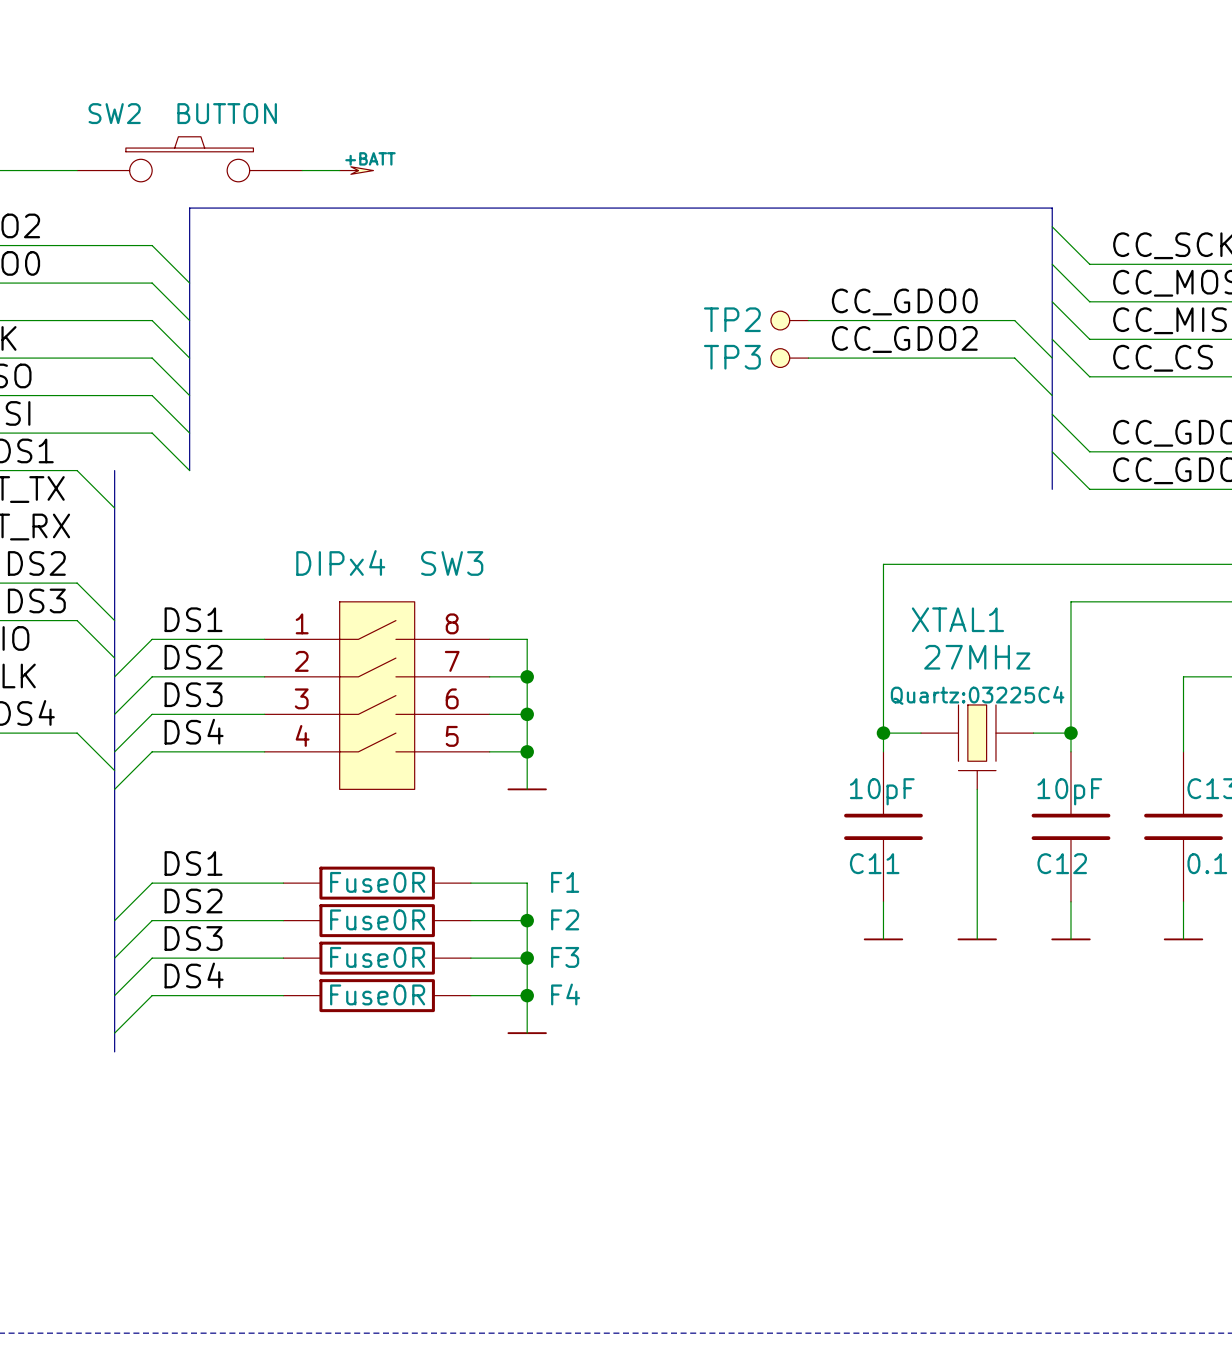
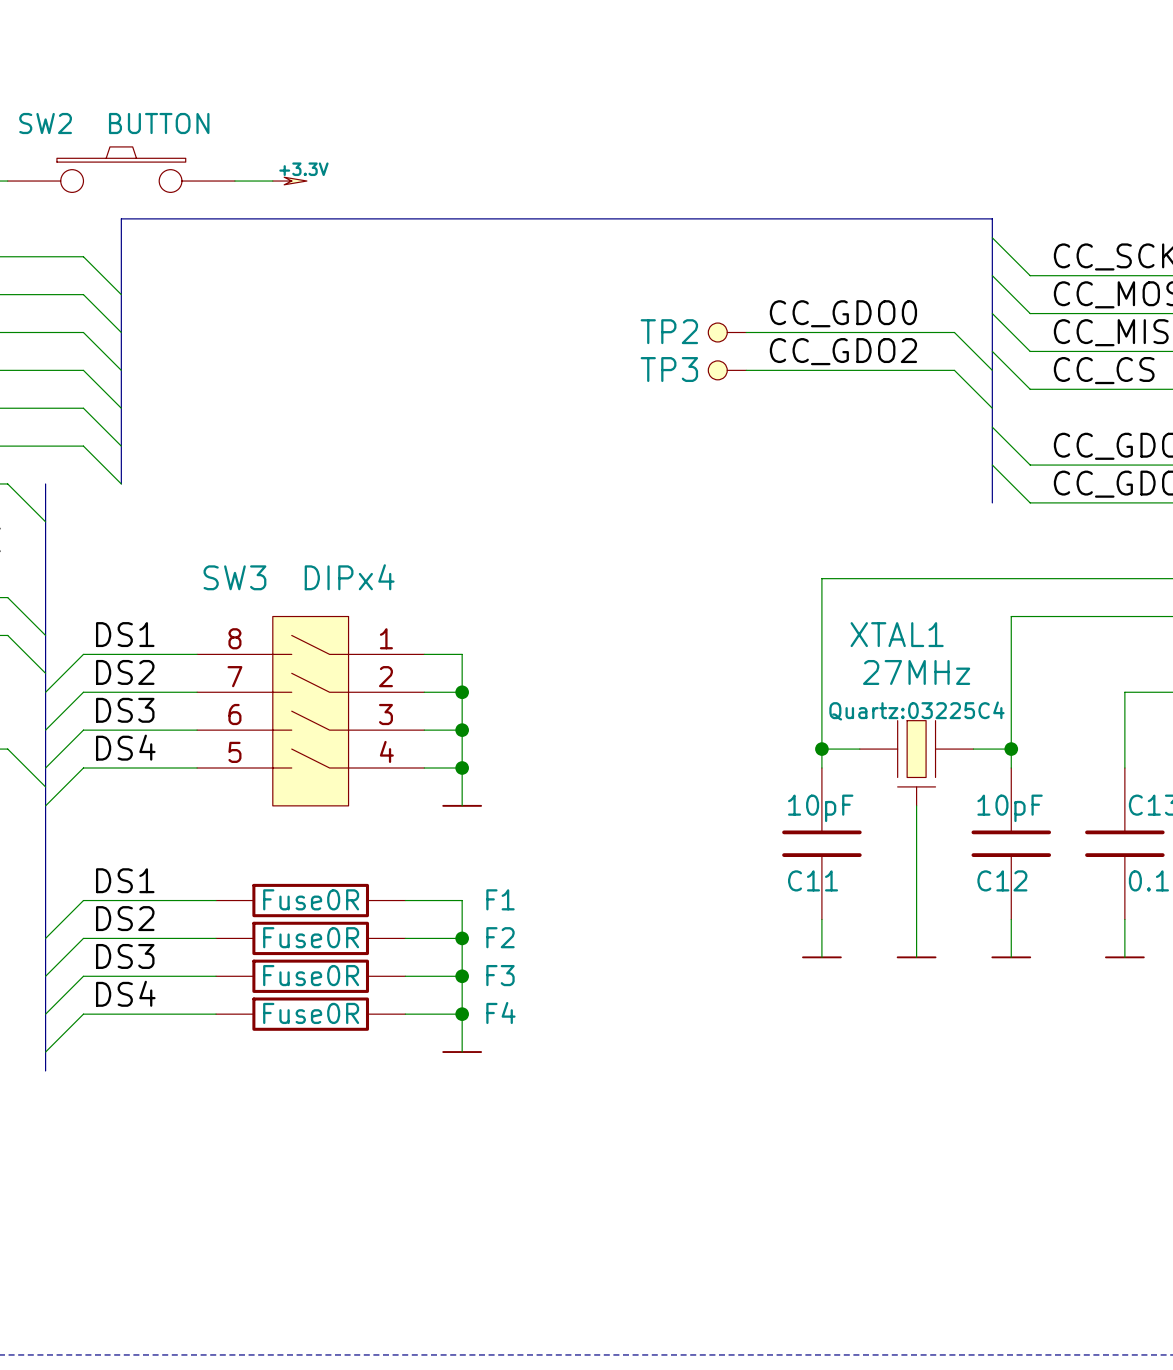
power symbol: +BATT (356, 170) -> +3.3V (289, 181)
SW3 flip: as is (377, 695) -> left-right (310, 711)

